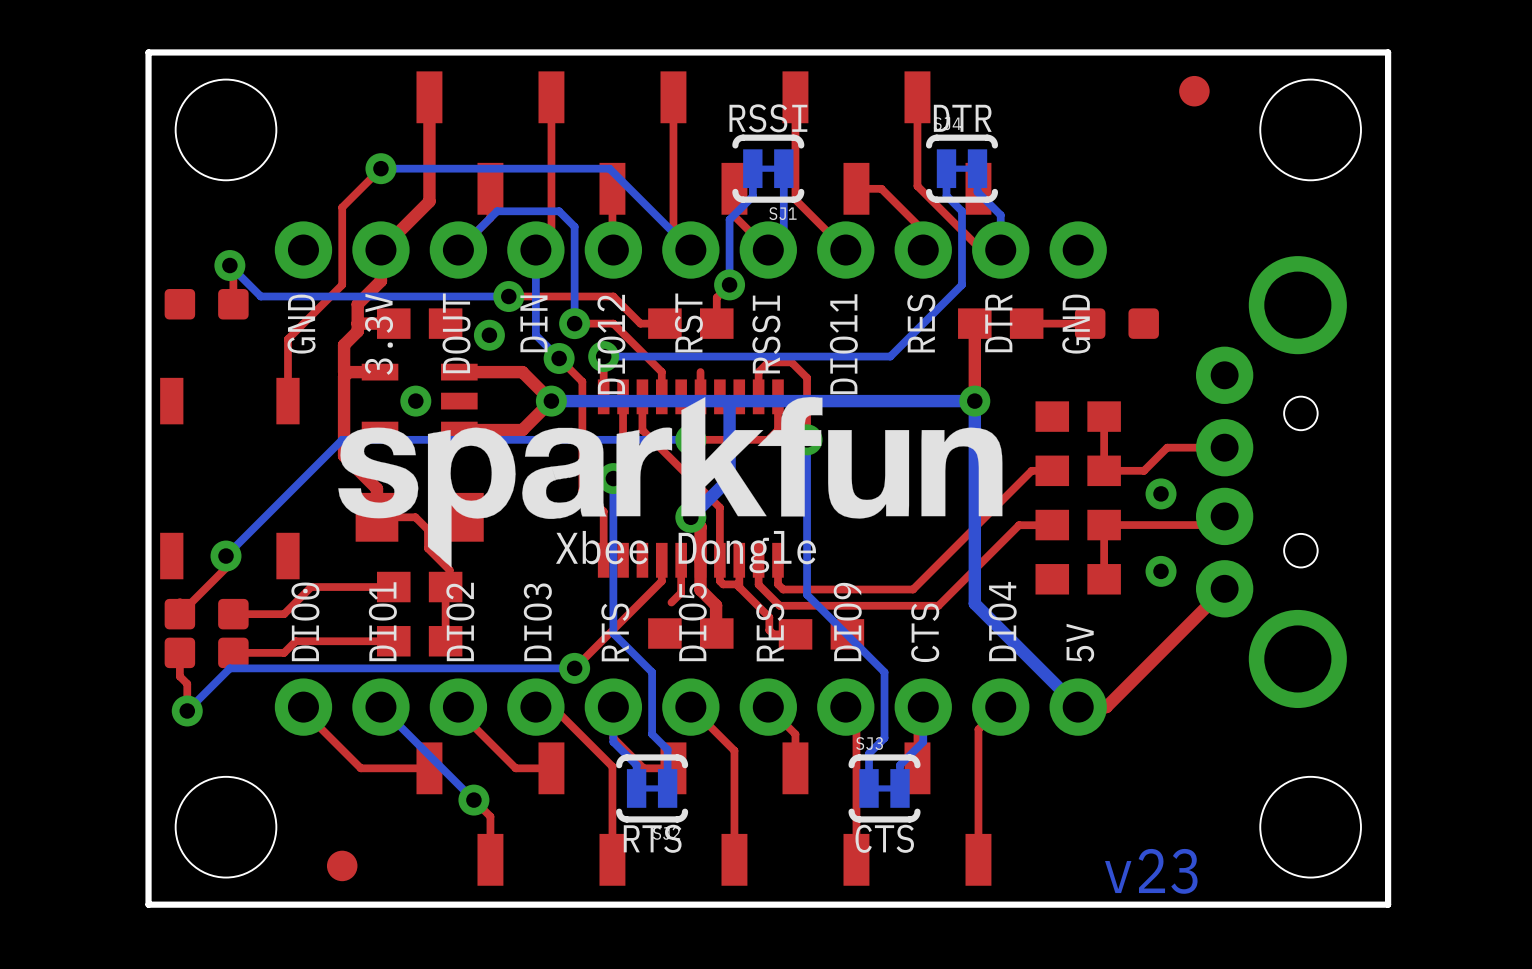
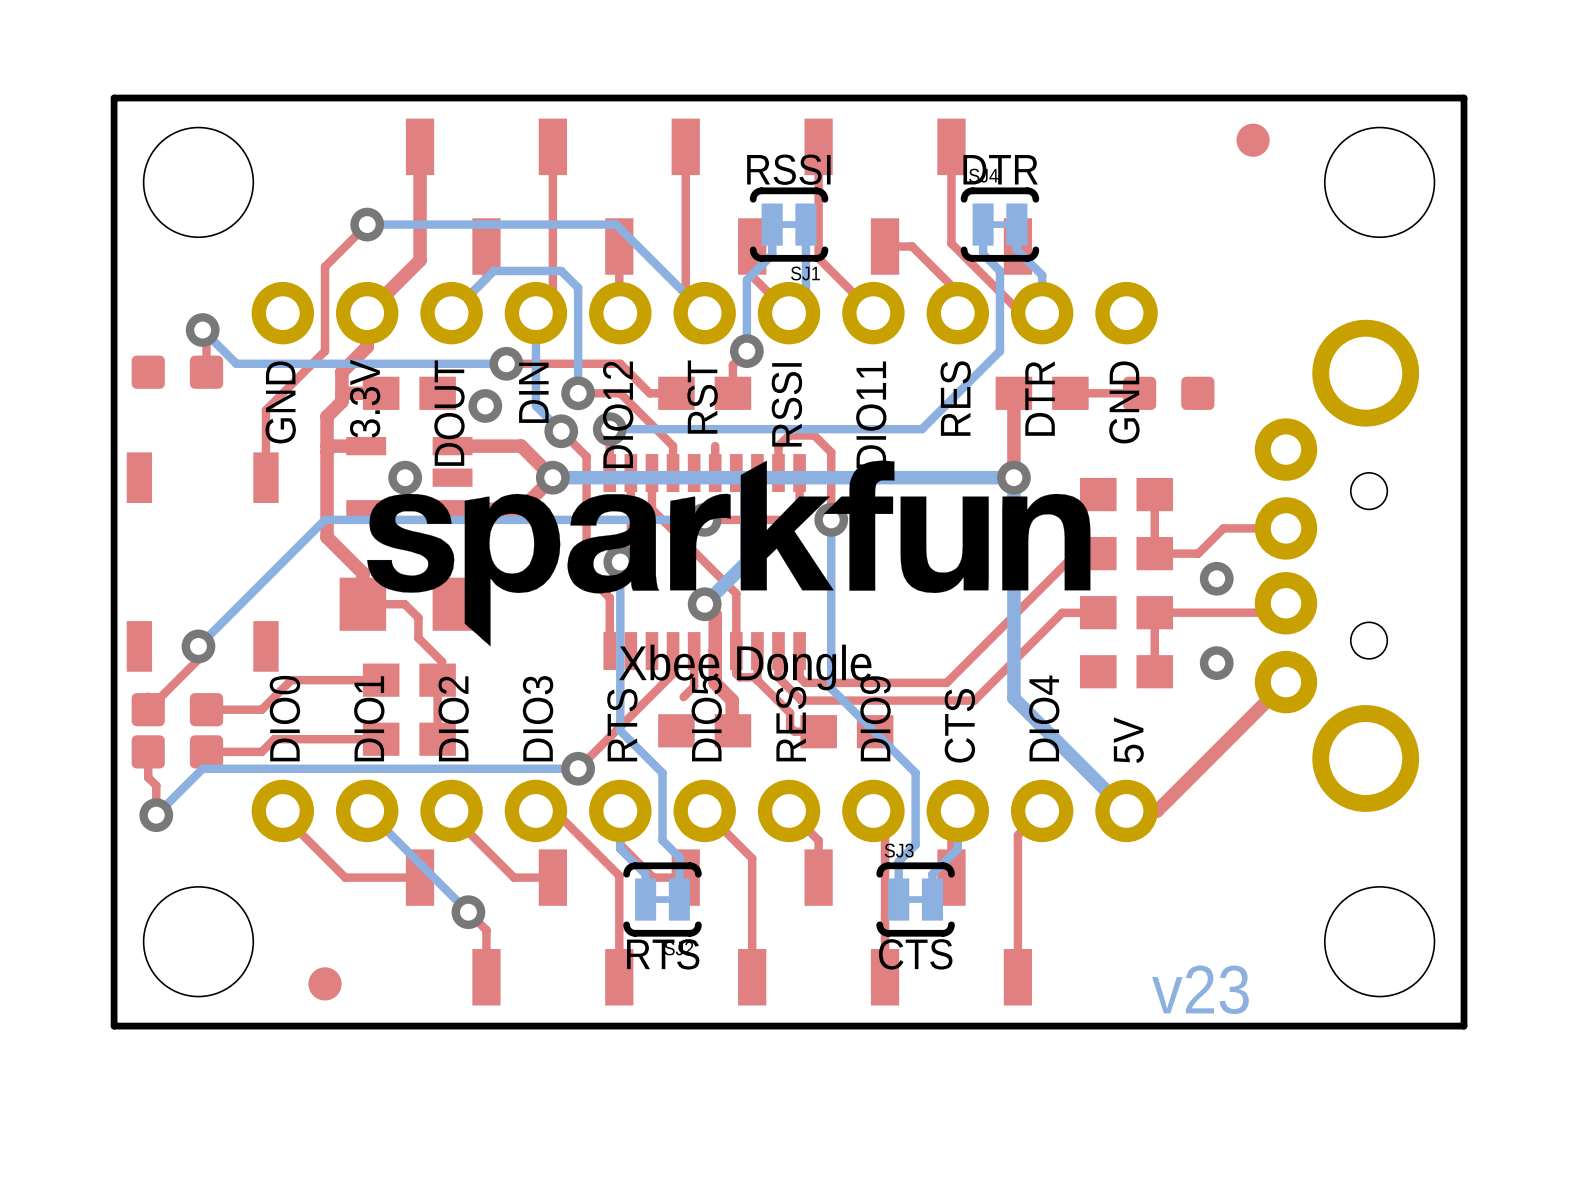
drawing position: (670, 482) -> (728, 553)
text position: Xbee Dongle (685, 552) -> Xbee Dongle (745, 667)

